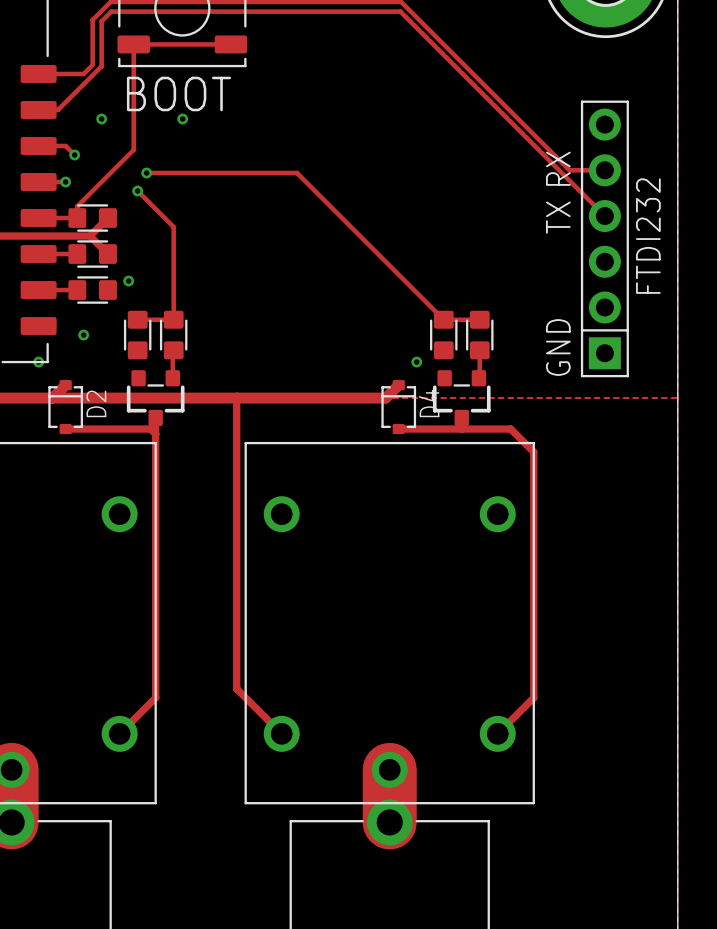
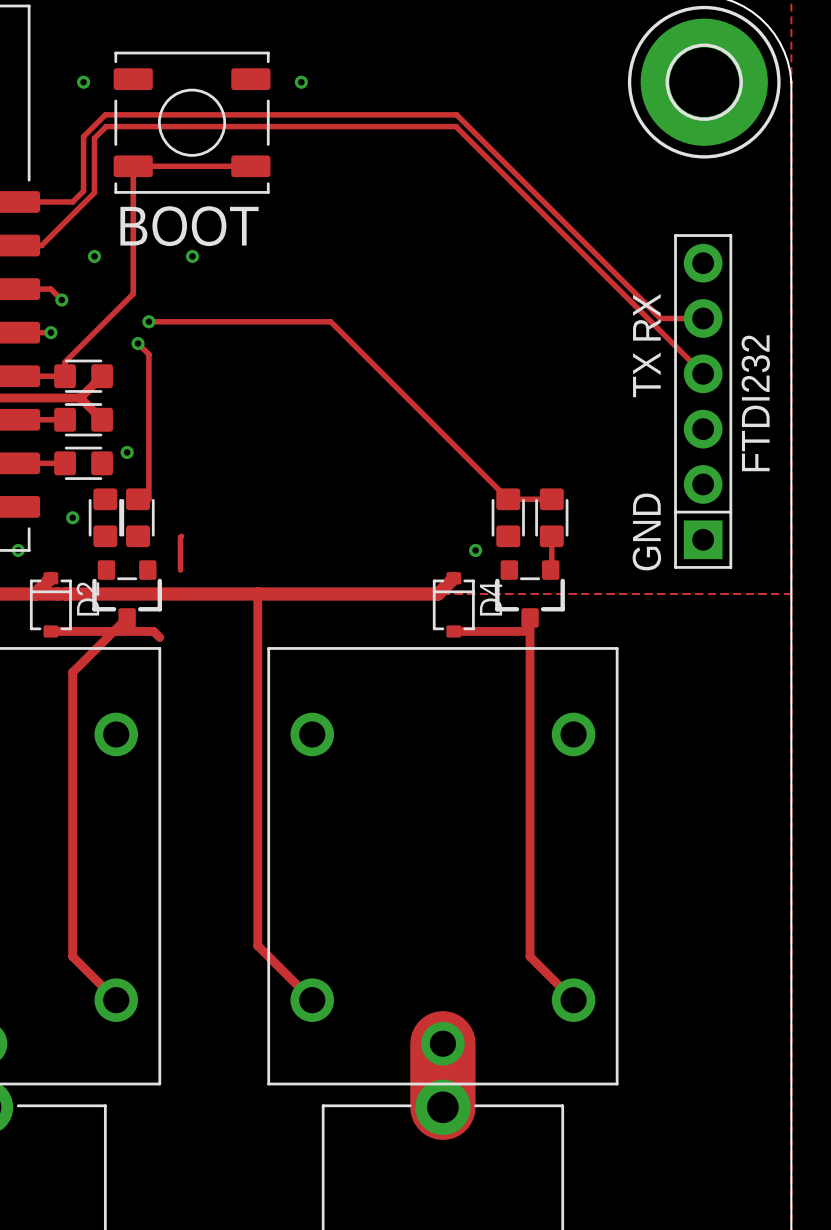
track: (146, 200) (173, 227) (173, 319) (146, 319) -> (148, 354) (148, 499)
part position: (173, 335) -> (105, 517)
part position: (155, 398) -> (127, 594)
track: (155, 417) (155, 697) (119, 733) -> (127, 617) (72, 672) (72, 956) (116, 1000)
track: (456, 429) (510, 429) (533, 452) (533, 697) (497, 733) -> (530, 631) (530, 956) (573, 1000)

